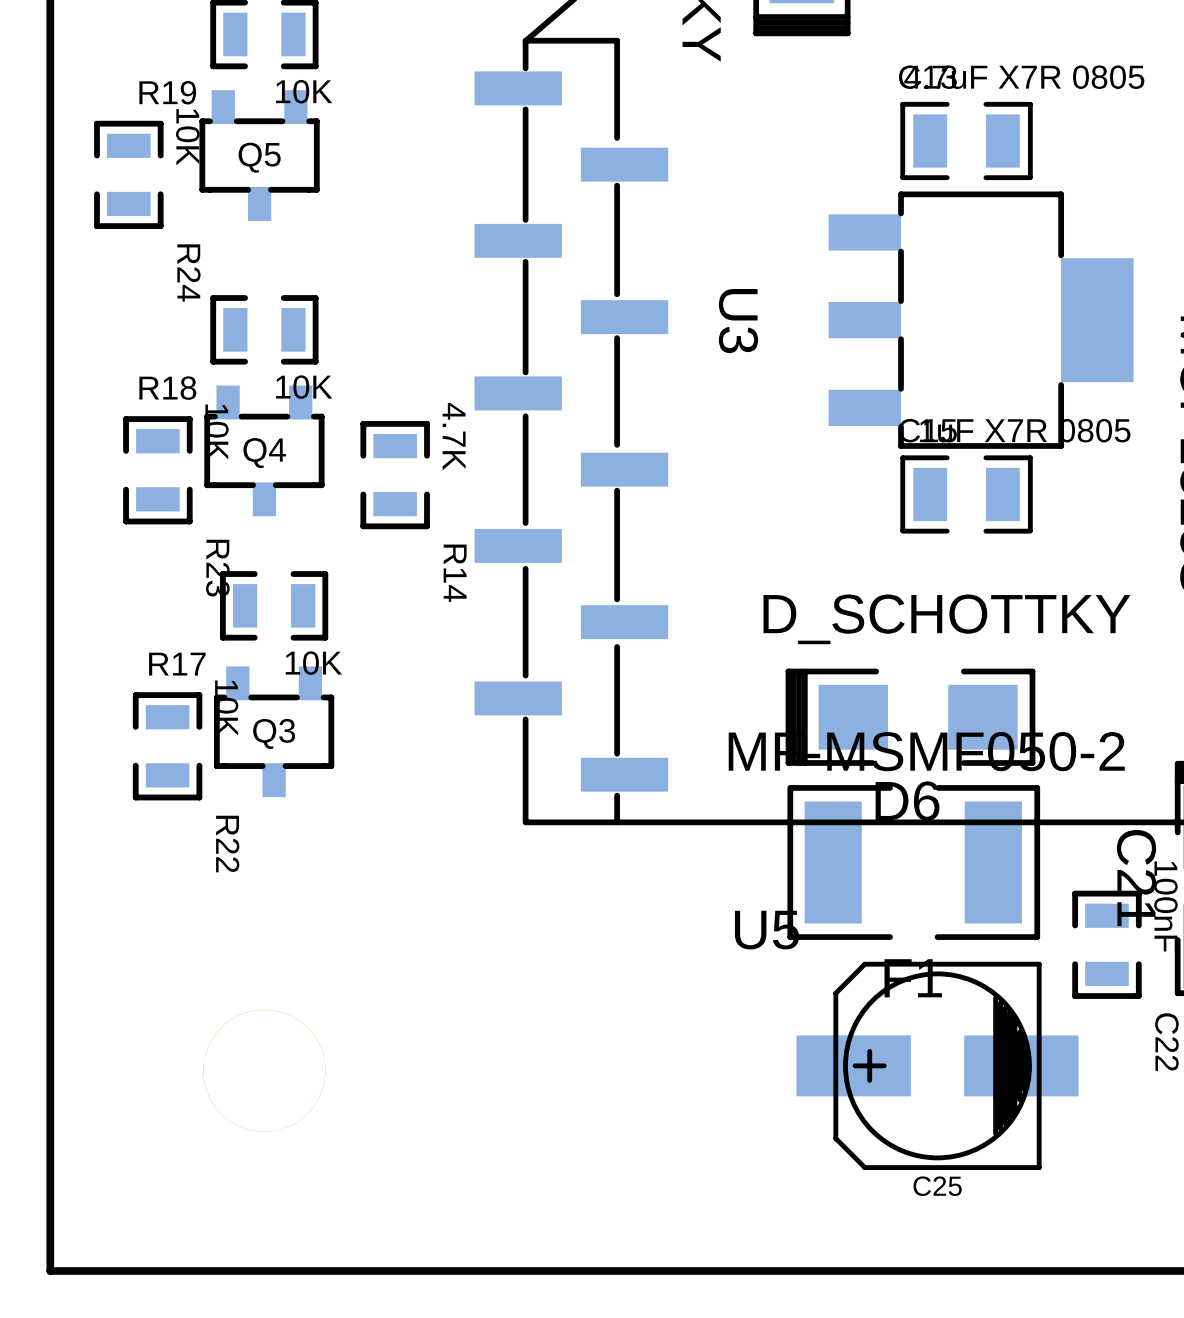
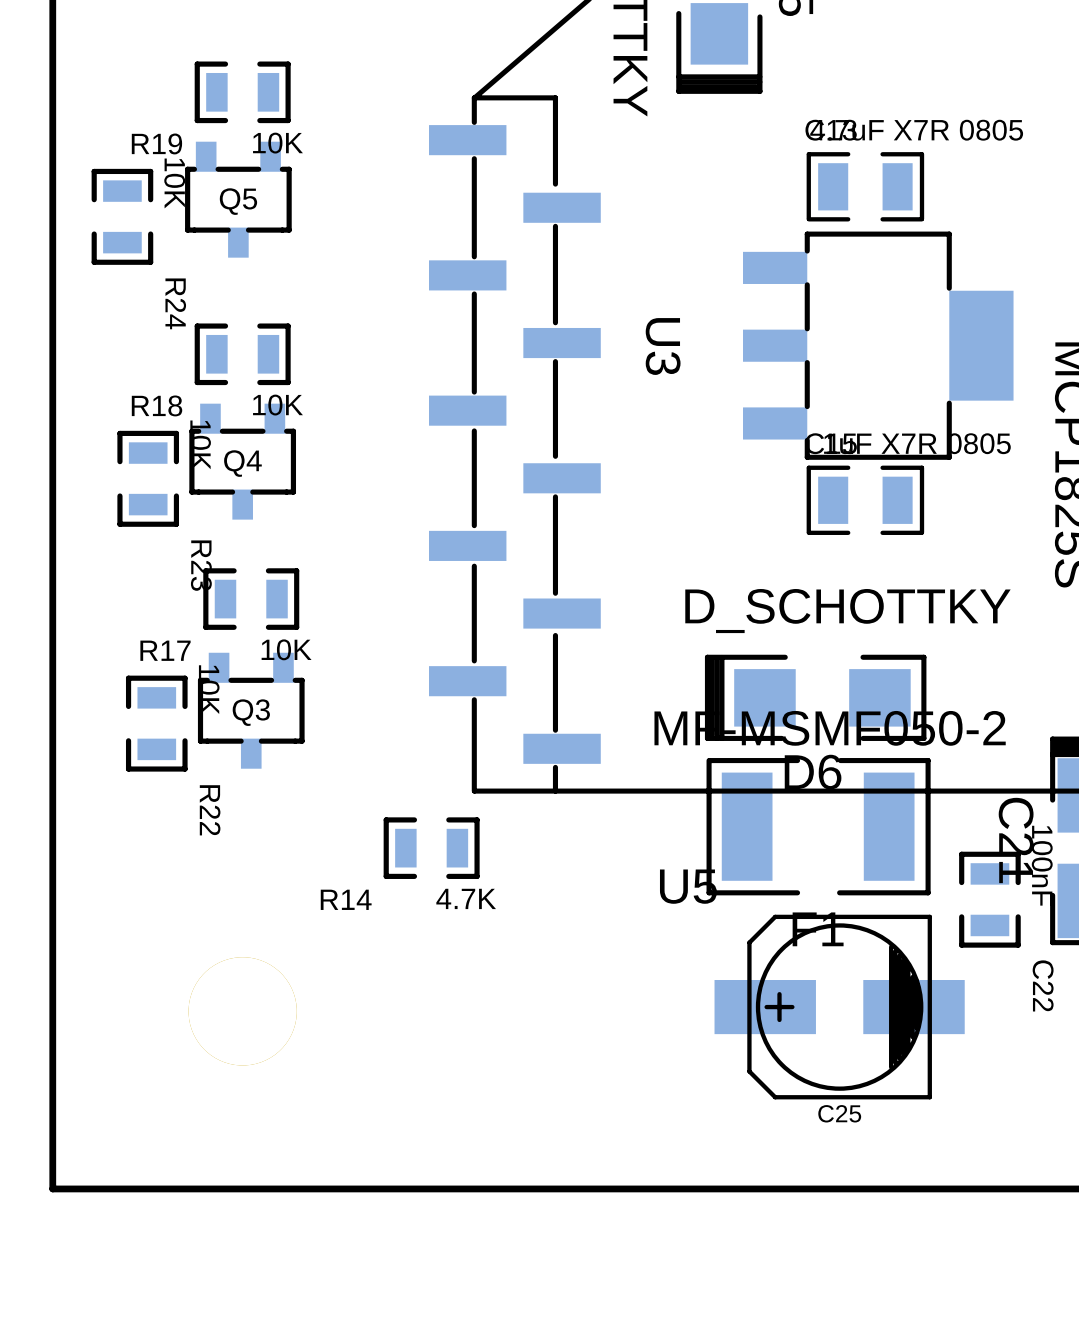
R14 rotation: 0° (395, 475) -> 90° clockwise (431, 848)
R14 position: (395, 475) -> (431, 848)

